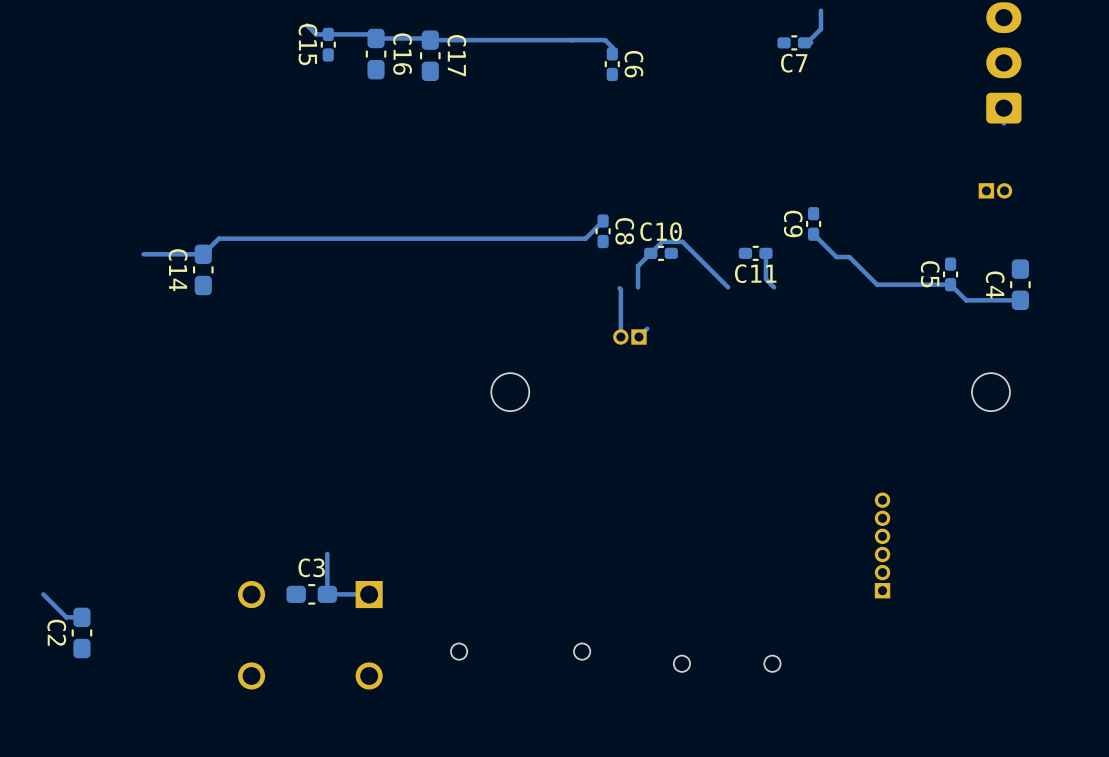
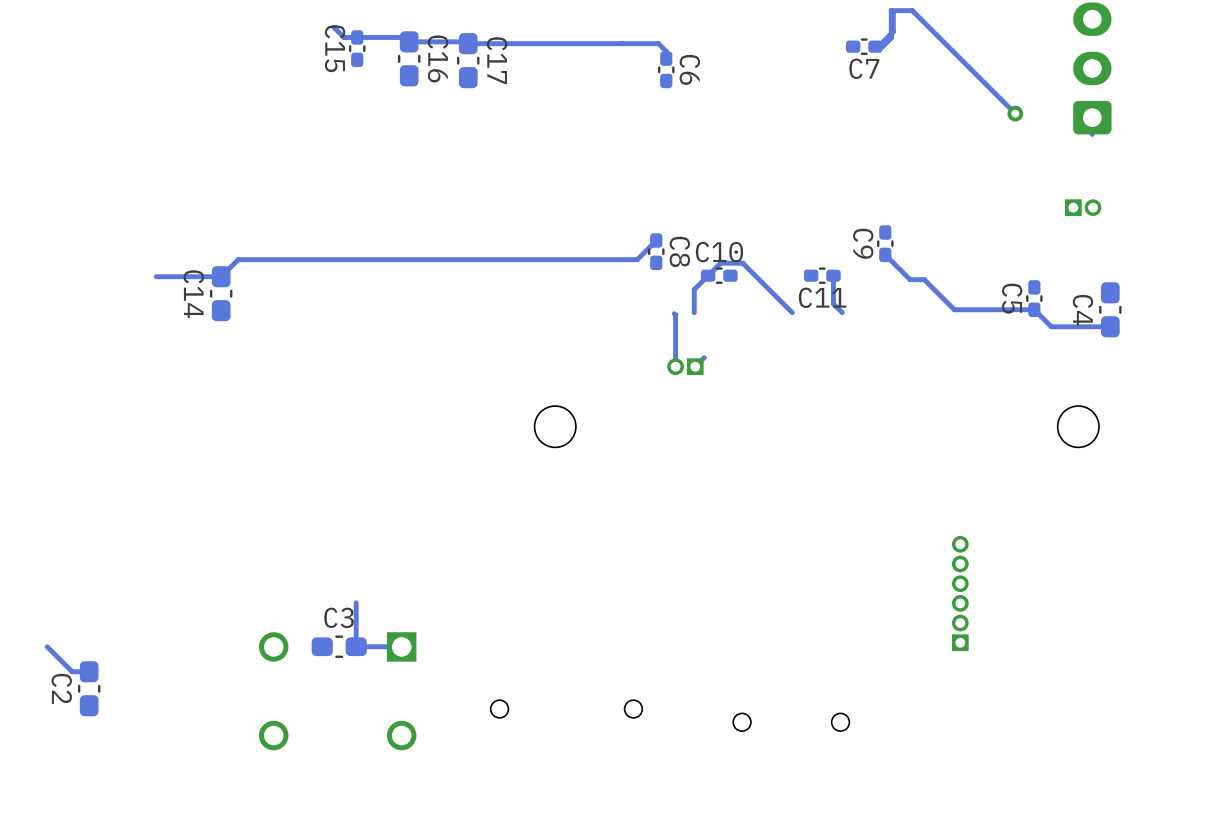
track: none -> (882, 46) (891, 38) (891, 10) (912, 10) (1015, 113)
via: none -> (1015, 113)

